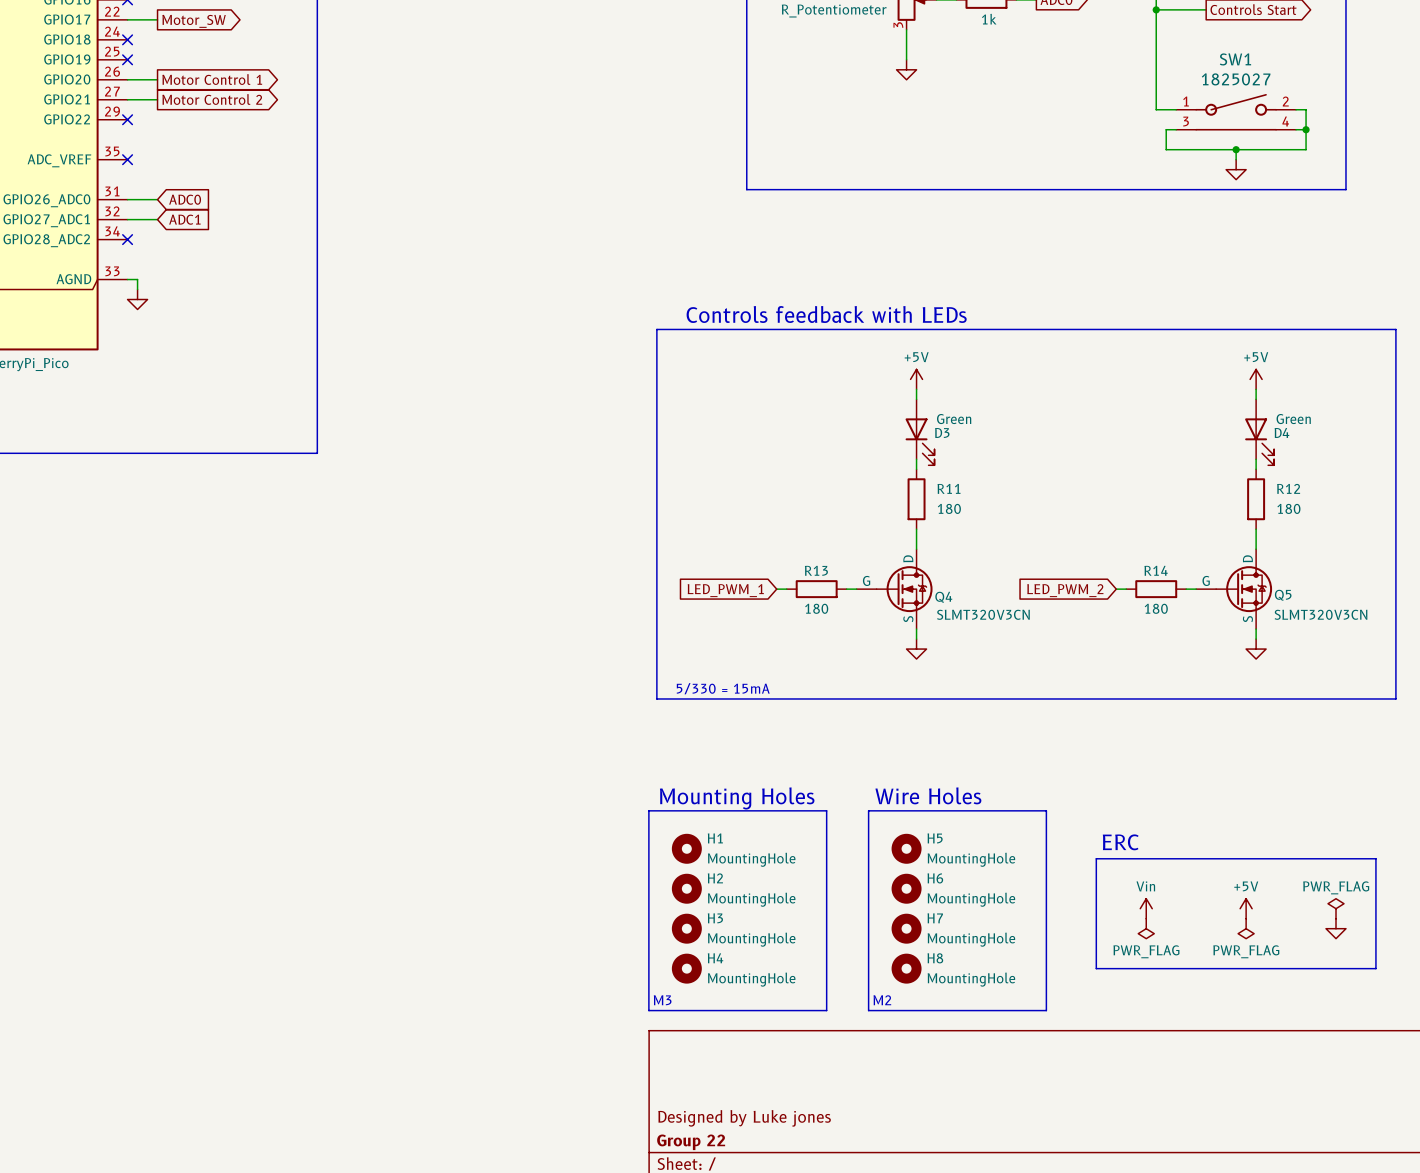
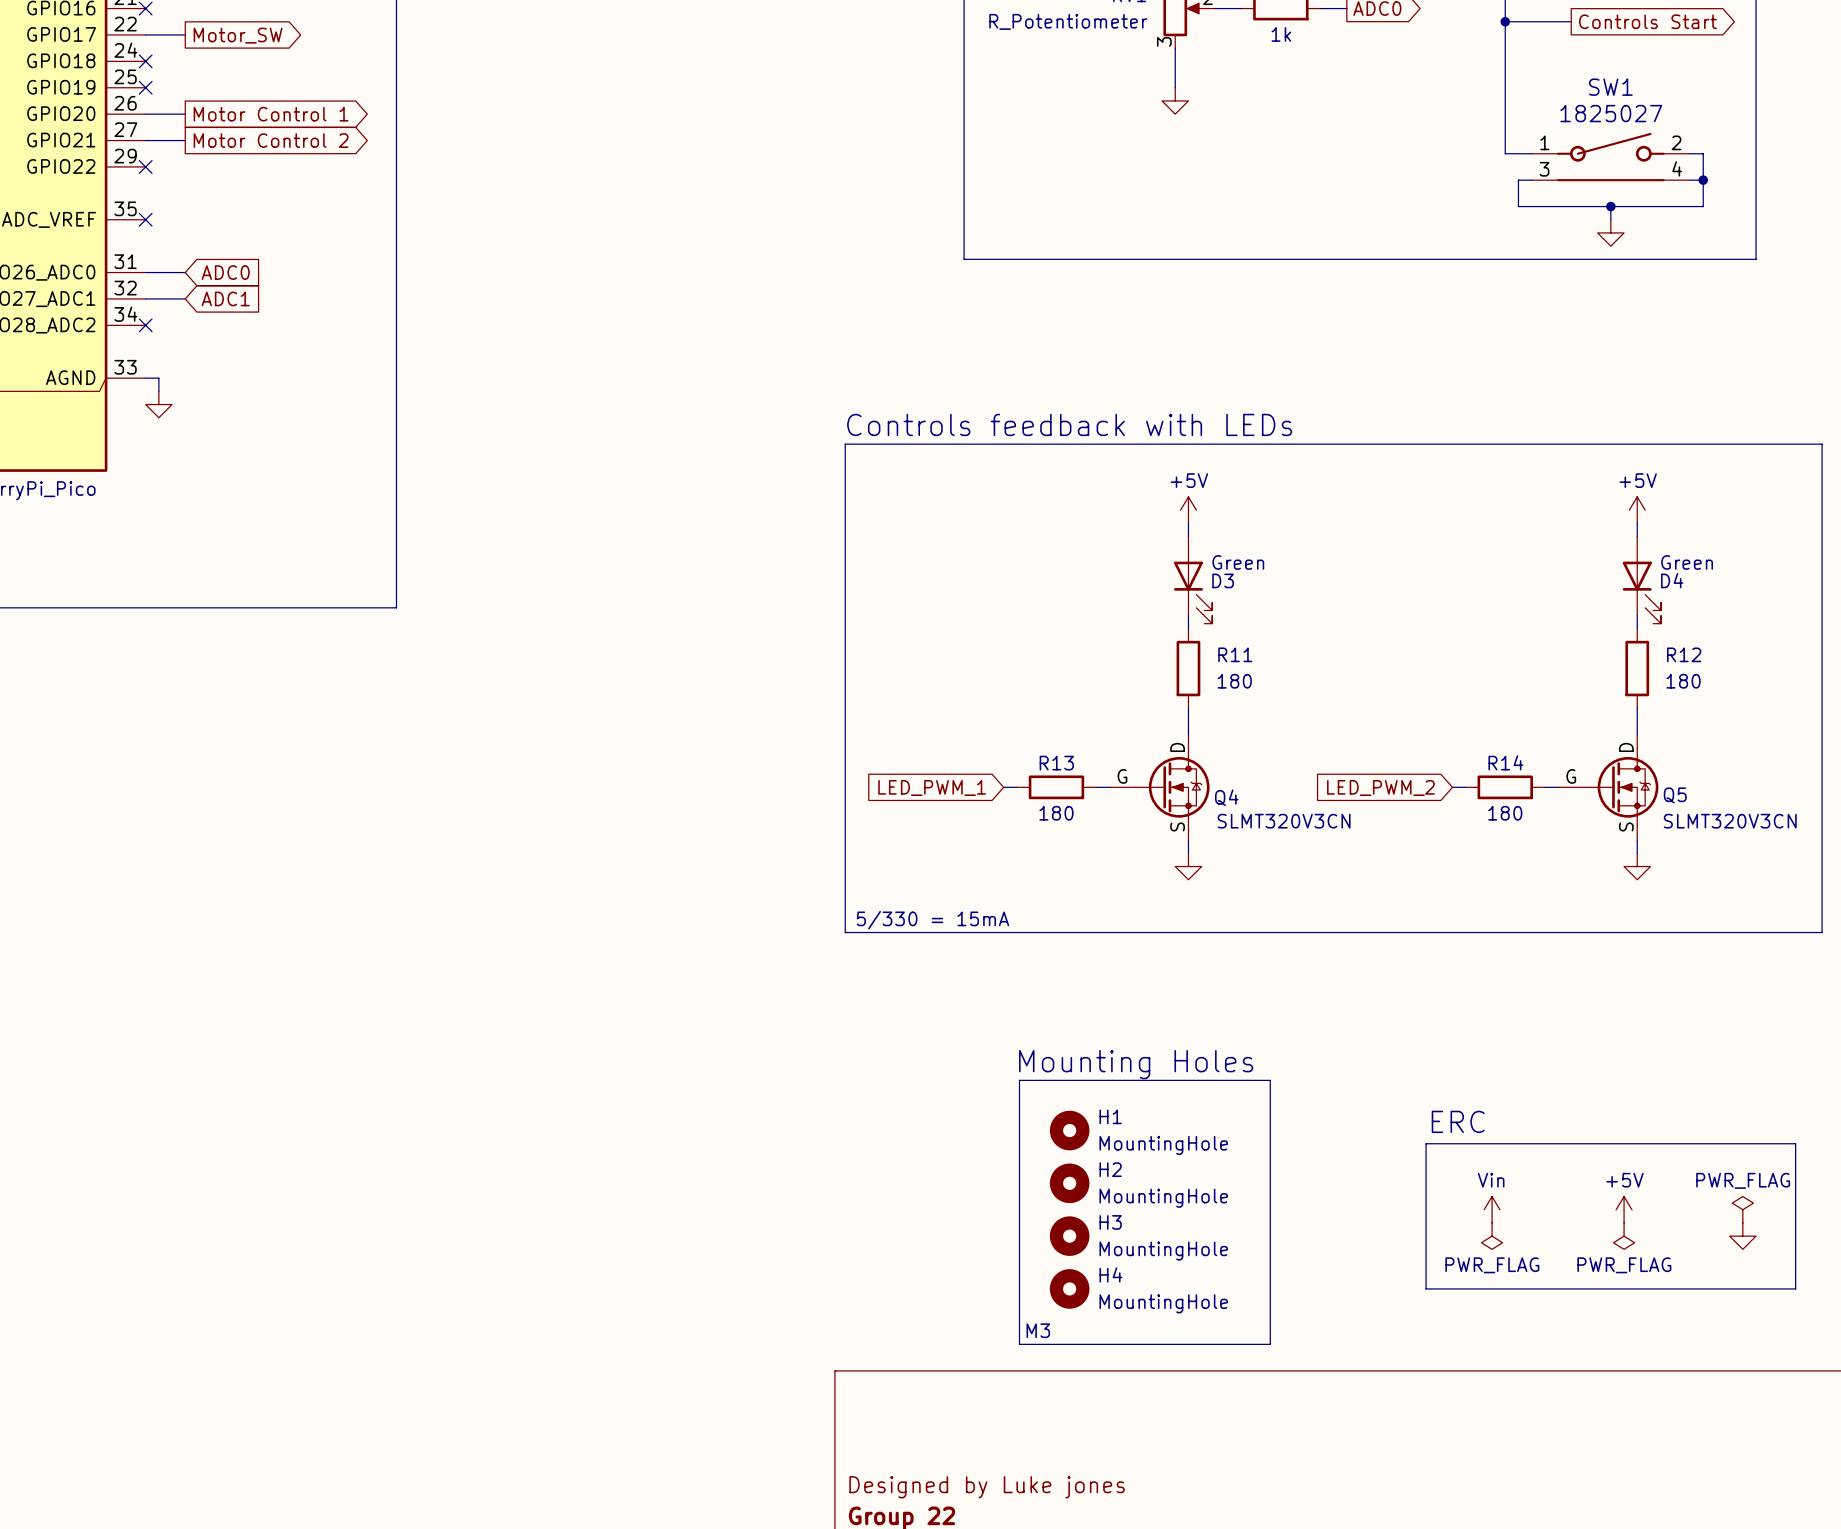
text: Wire Holes (928, 795) -> none
text position: Mounting Holes (737, 798) -> Mounting Holes (1136, 1064)
line: (788, 810) (648, 810) (648, 1010) (788, 1010) -> (1019, 1080) (1019, 1344)
line: (826, 810) (826, 1010) -> (1069, 1080) (1125, 1080)
line: (868, 810) (868, 1010) -> (1069, 1344) (1125, 1344)
line: (978, 810) (1046, 810) (1046, 1010) (978, 1010) -> (1270, 1080) (1270, 1344)
H1 position: (686, 848) -> (1069, 1130)
H5: MountingHole (906, 848) -> none
H2 position: (686, 888) -> (1069, 1183)
H6: MountingHole (906, 888) -> none
H3 position: (686, 928) -> (1069, 1236)
H7: MountingHole (906, 928) -> none
H4 position: (686, 968) -> (1069, 1288)
H8: MountingHole (906, 968) -> none
text position: M3 (662, 1000) -> M3 (1038, 1330)
text: M2 (882, 1000) -> none

